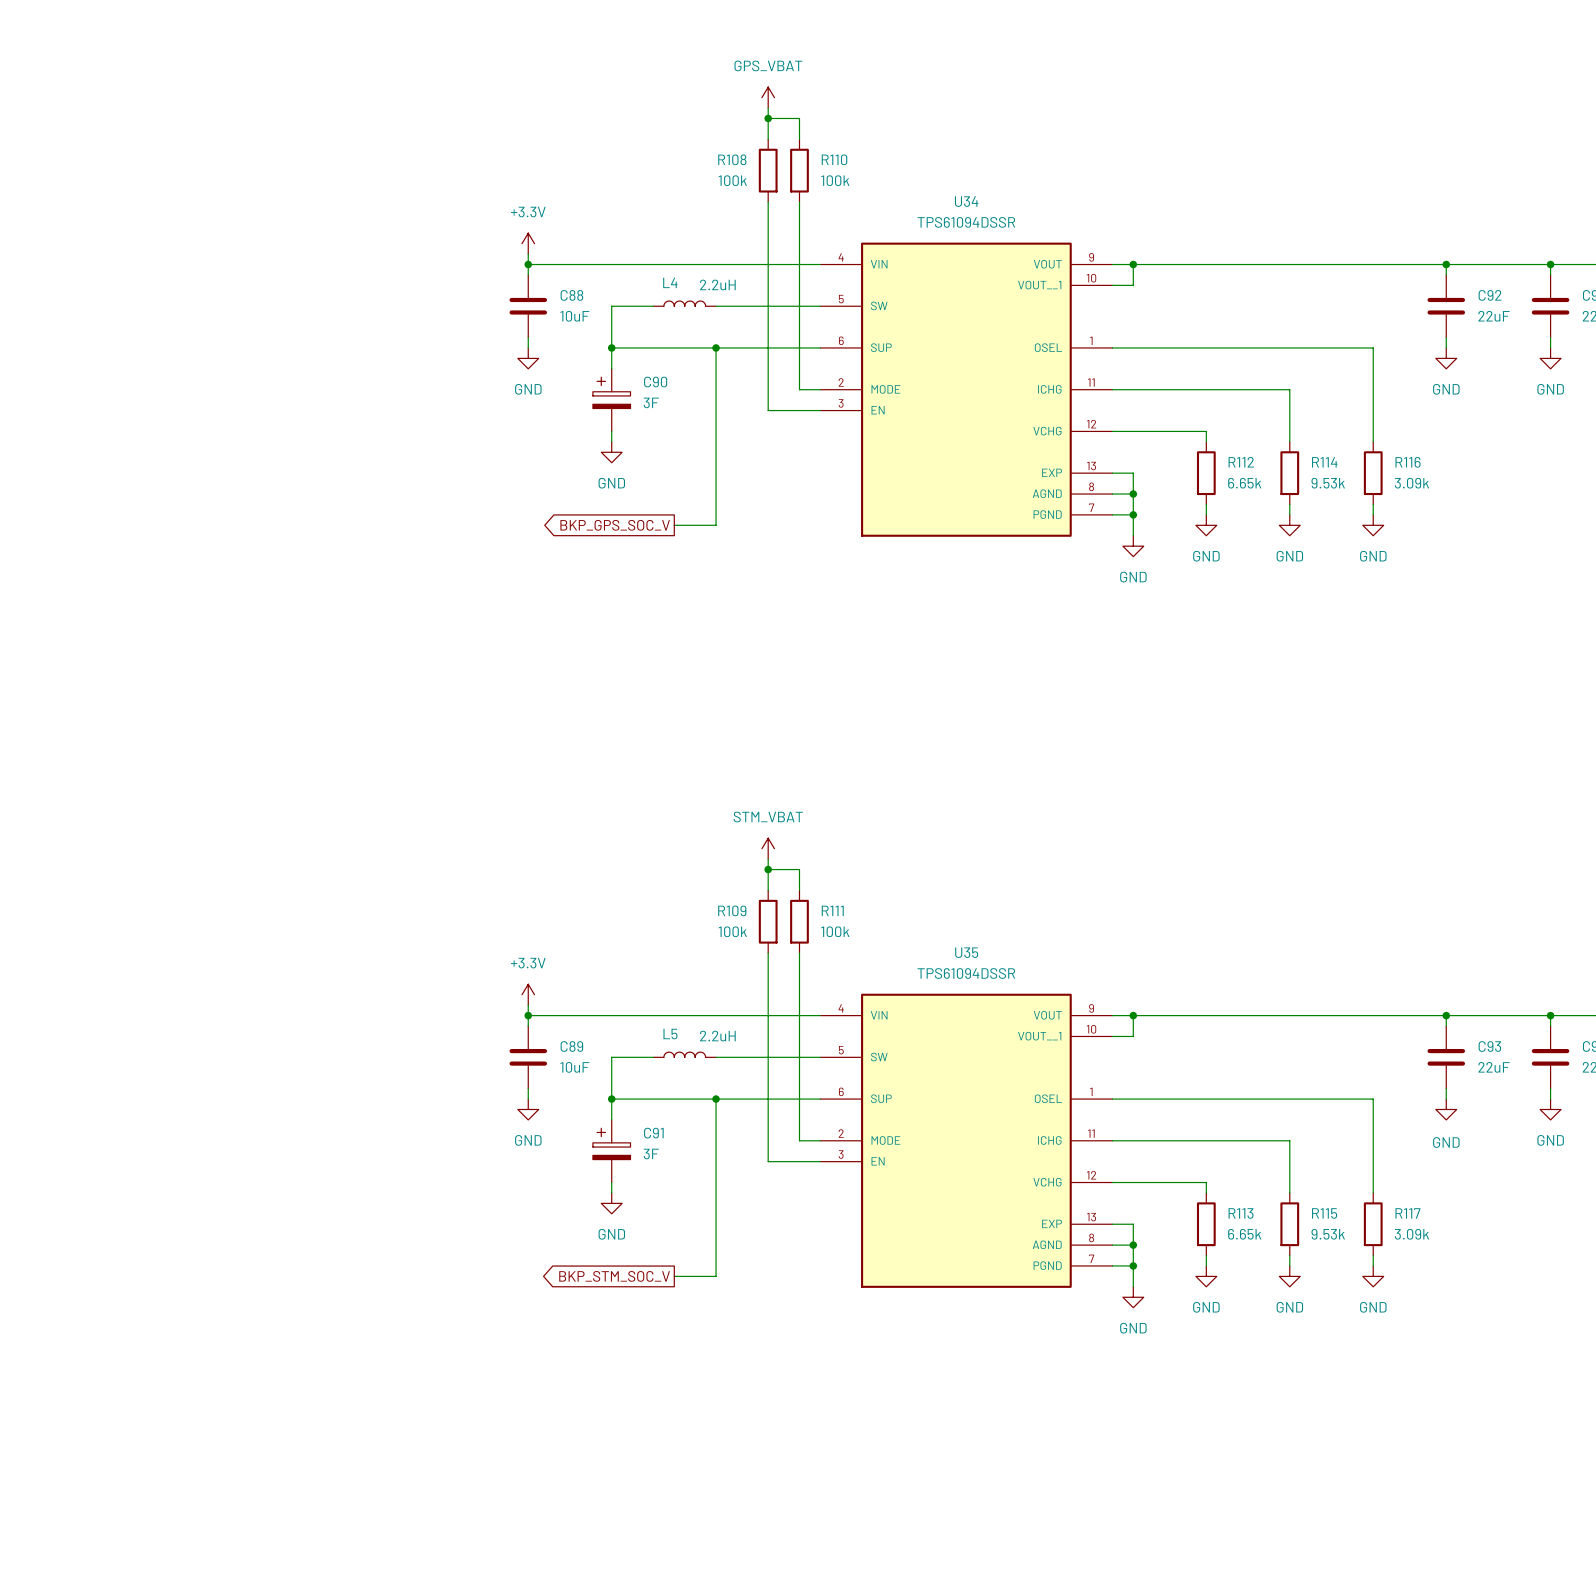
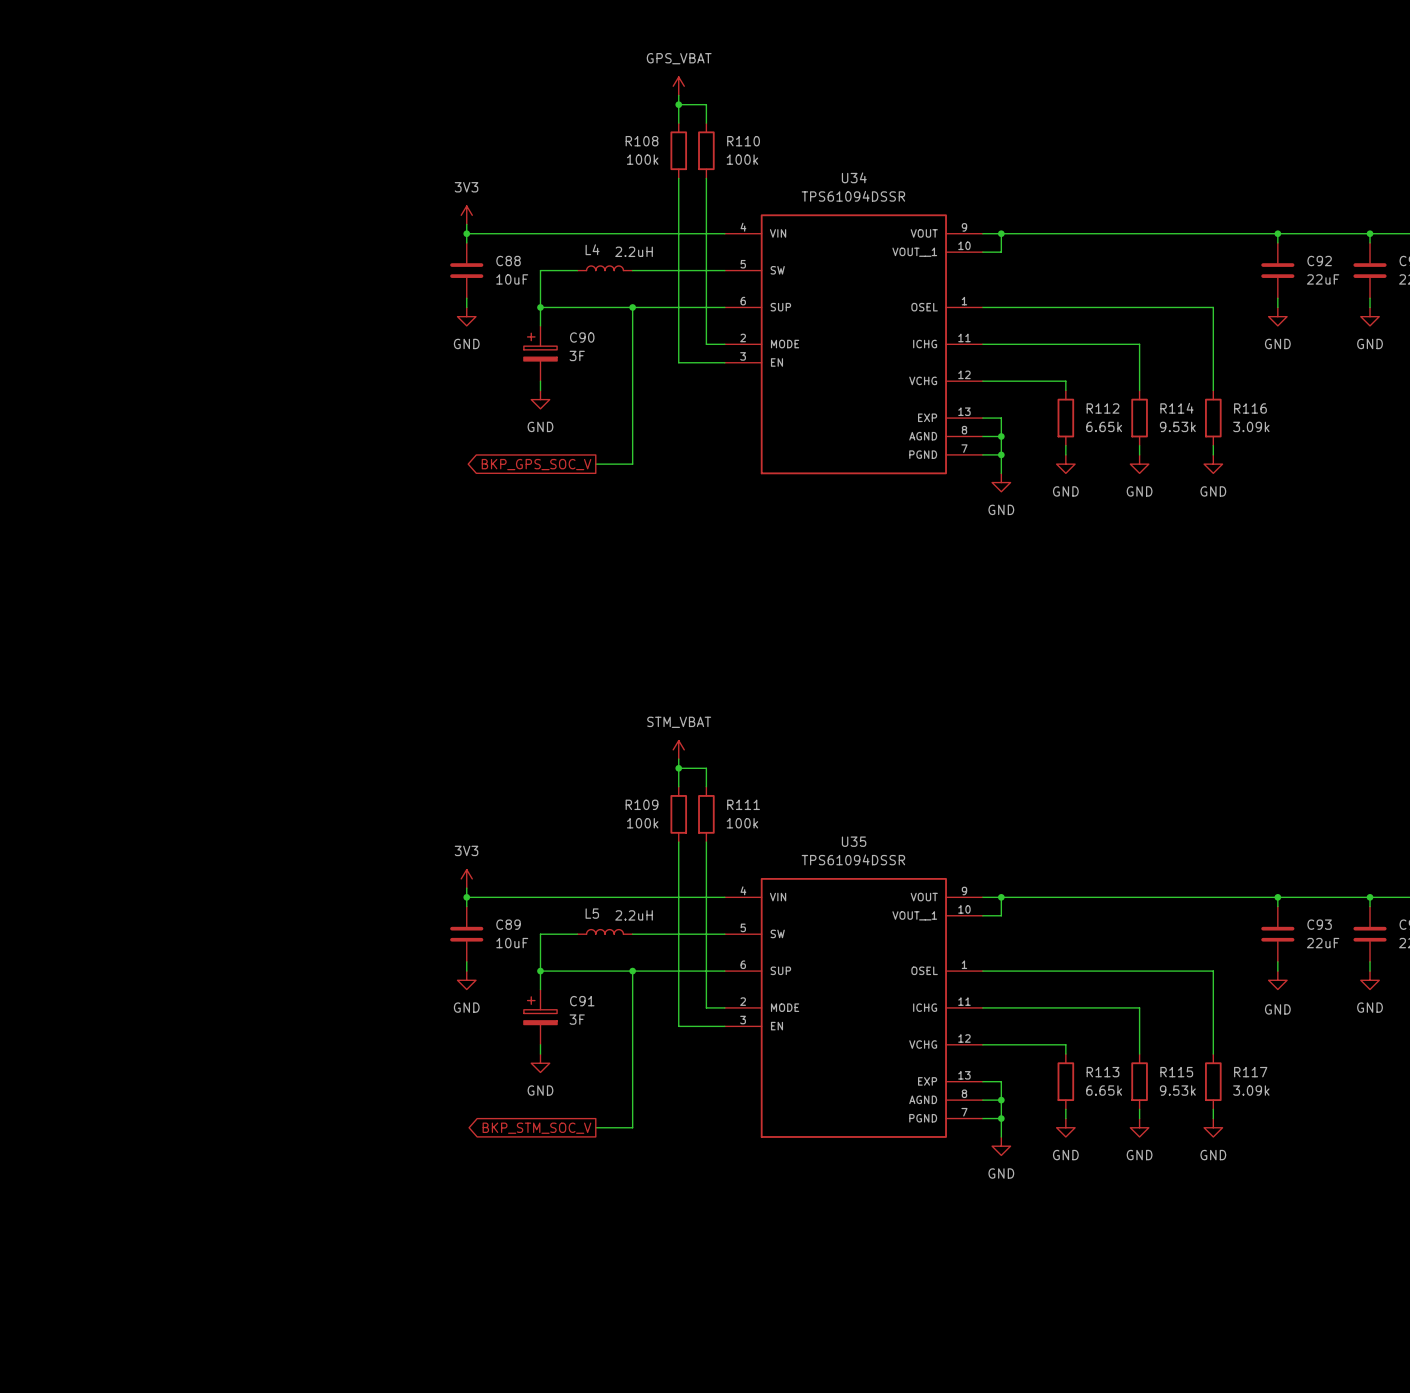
power symbol: +3.3V (528, 243) -> 3V3 (466, 215)
power symbol: +3.3V (528, 994) -> 3V3 (466, 878)

